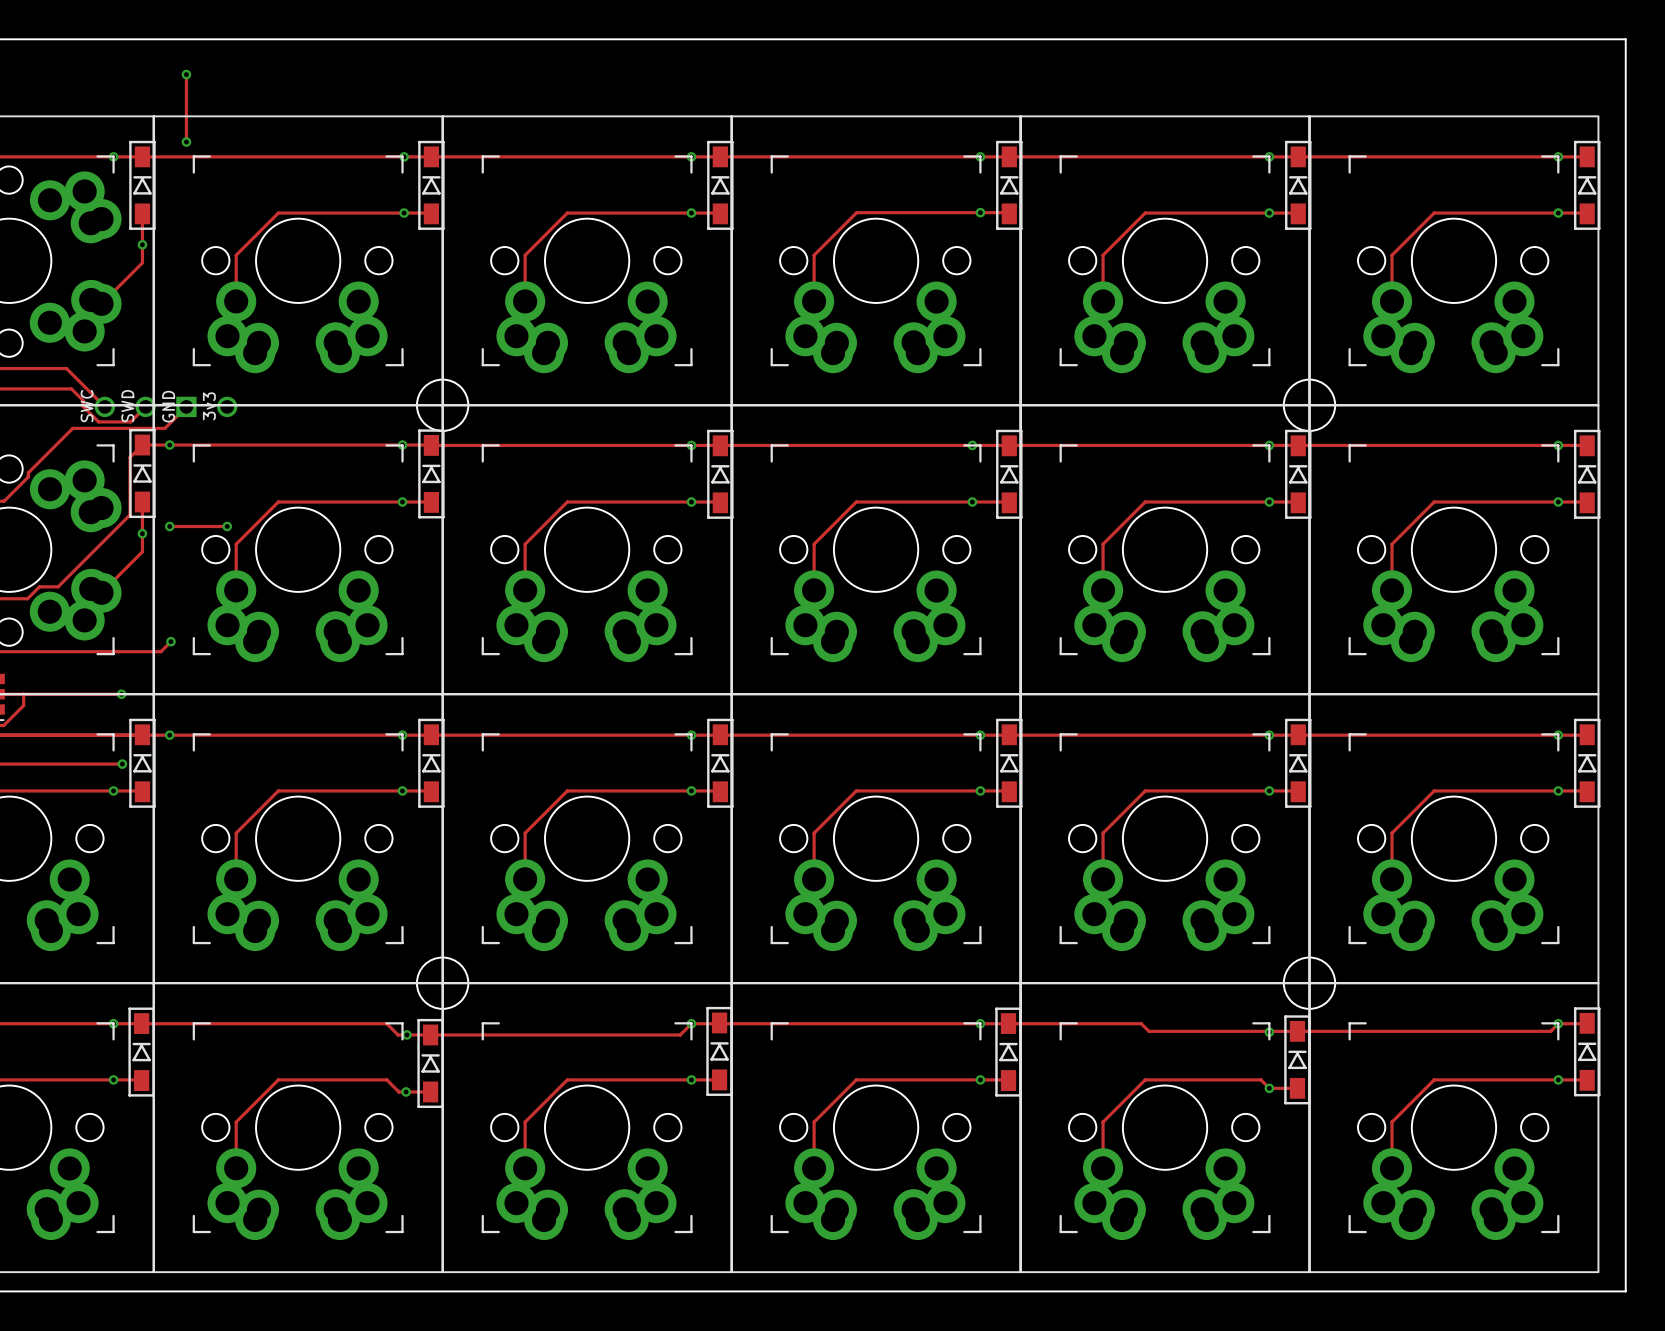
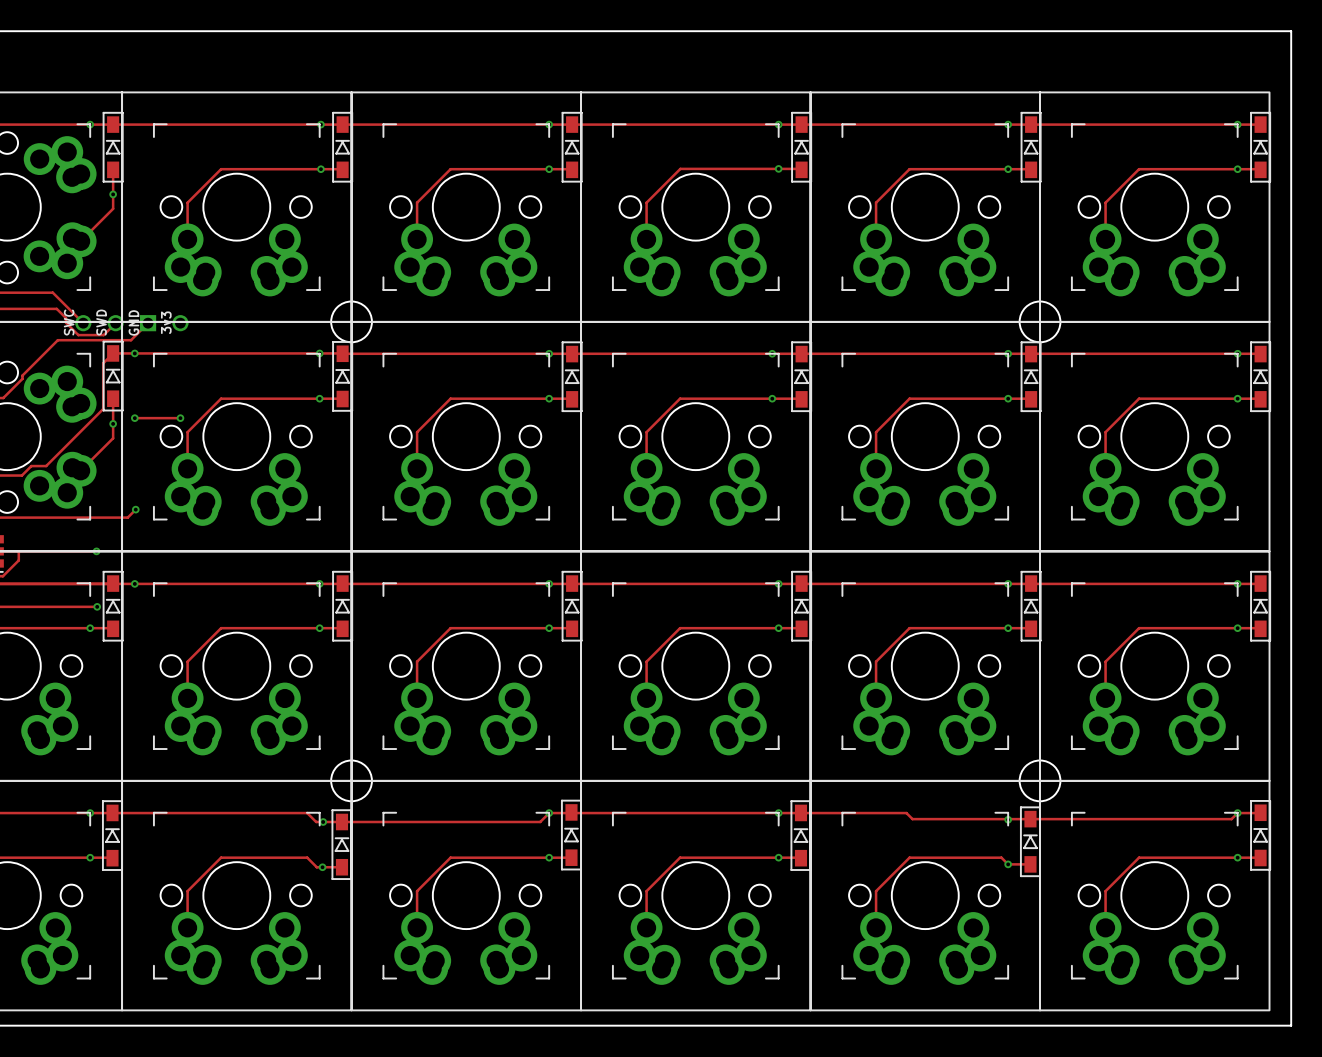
track: (185, 71) (186, 142) -> none
via: (186, 74) -> none
via: (186, 142) -> none

